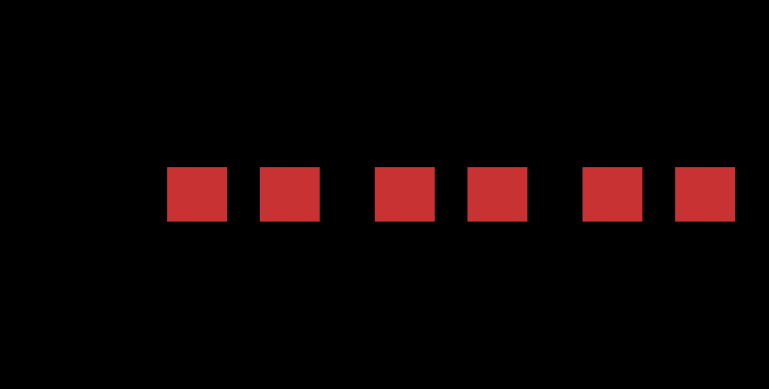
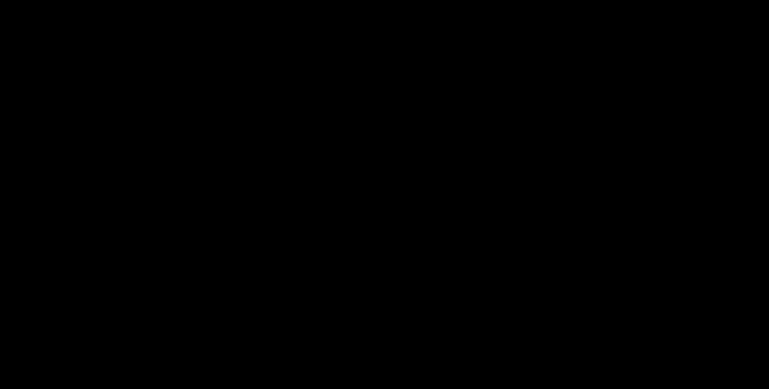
part: (243, 194) -> none
part: (451, 194) -> none
part: (658, 194) -> none

